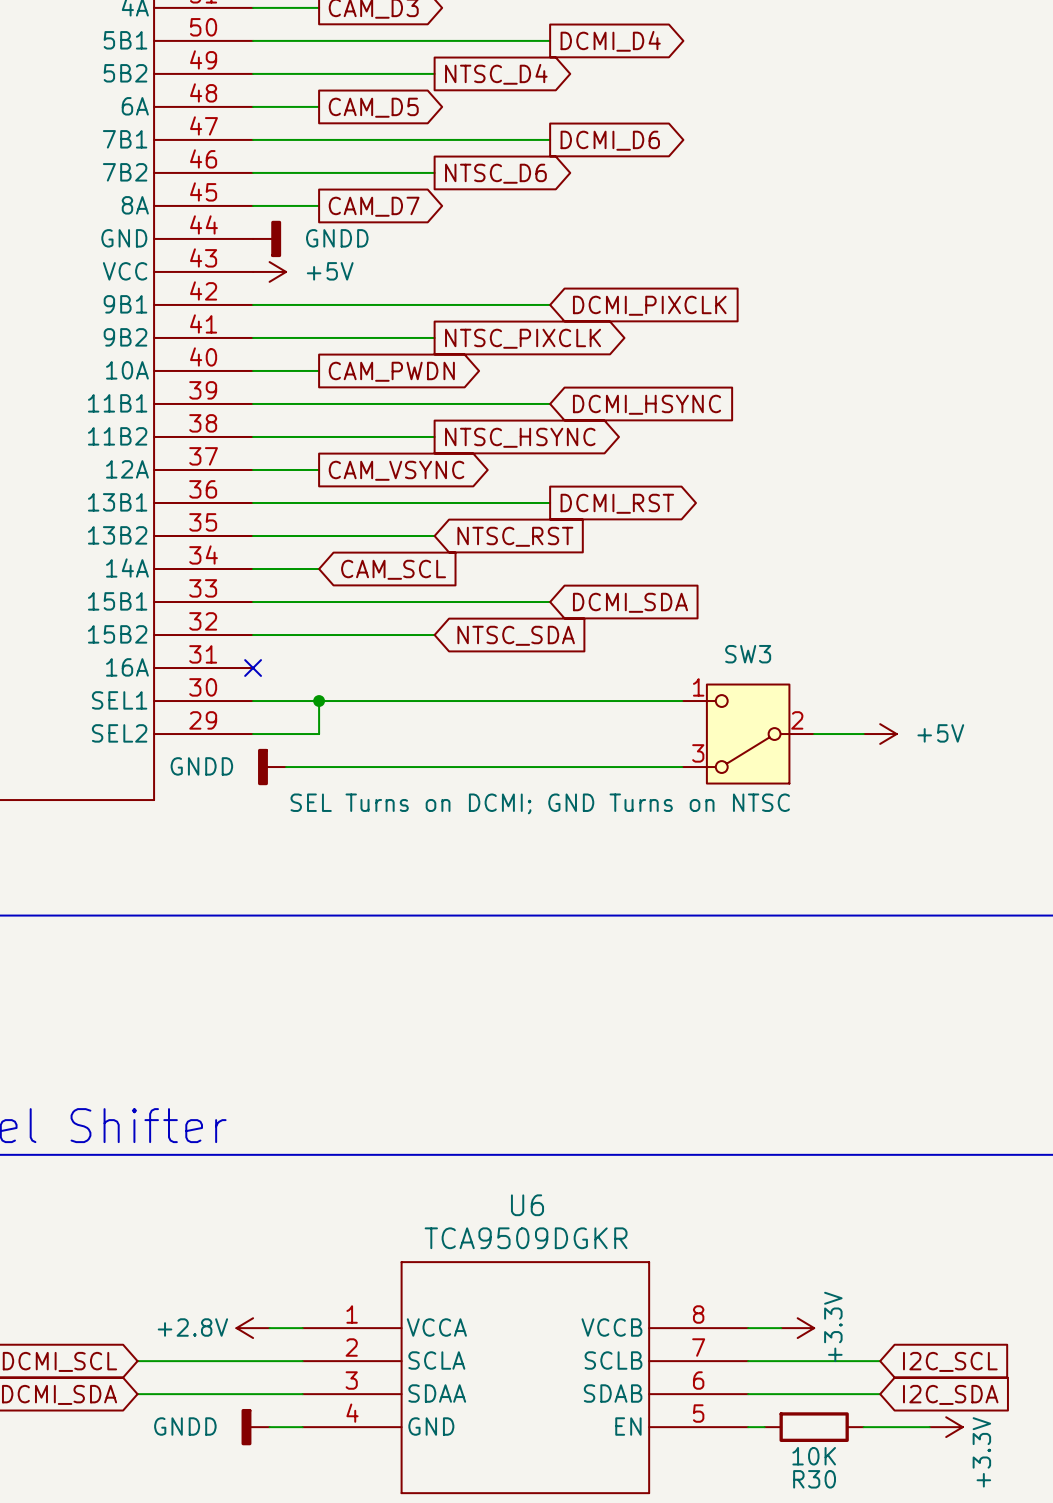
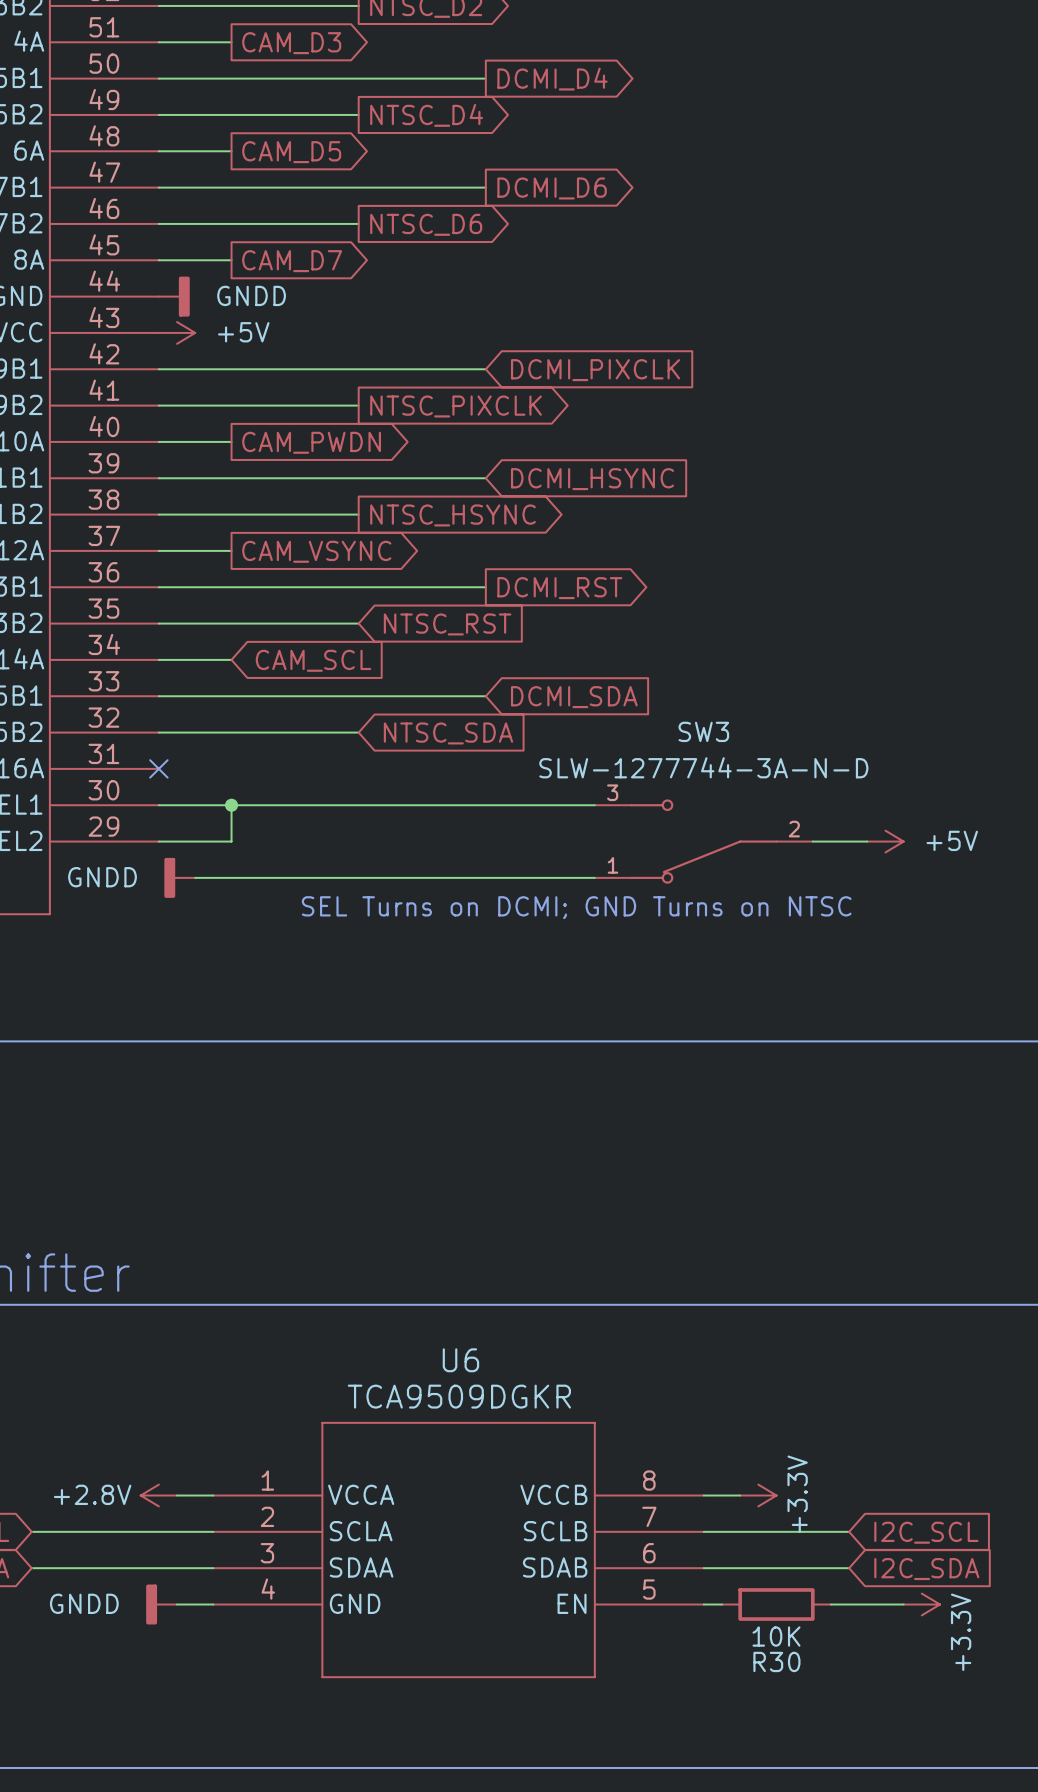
SW3 value: none -> SLW-1277744-3A-N-D (703, 767)
SW3 symbol: [682, 684, 815, 784] -> [594, 799, 813, 884]
power symbol position: +5V (880, 734) -> +5V (885, 841)
text: none -> SEL Turns on DCMI; GND Turns on NTSC (576, 907)
SW3 text: SEL Turns on DCMI; GND Turns on NTSC (540, 803) -> none

